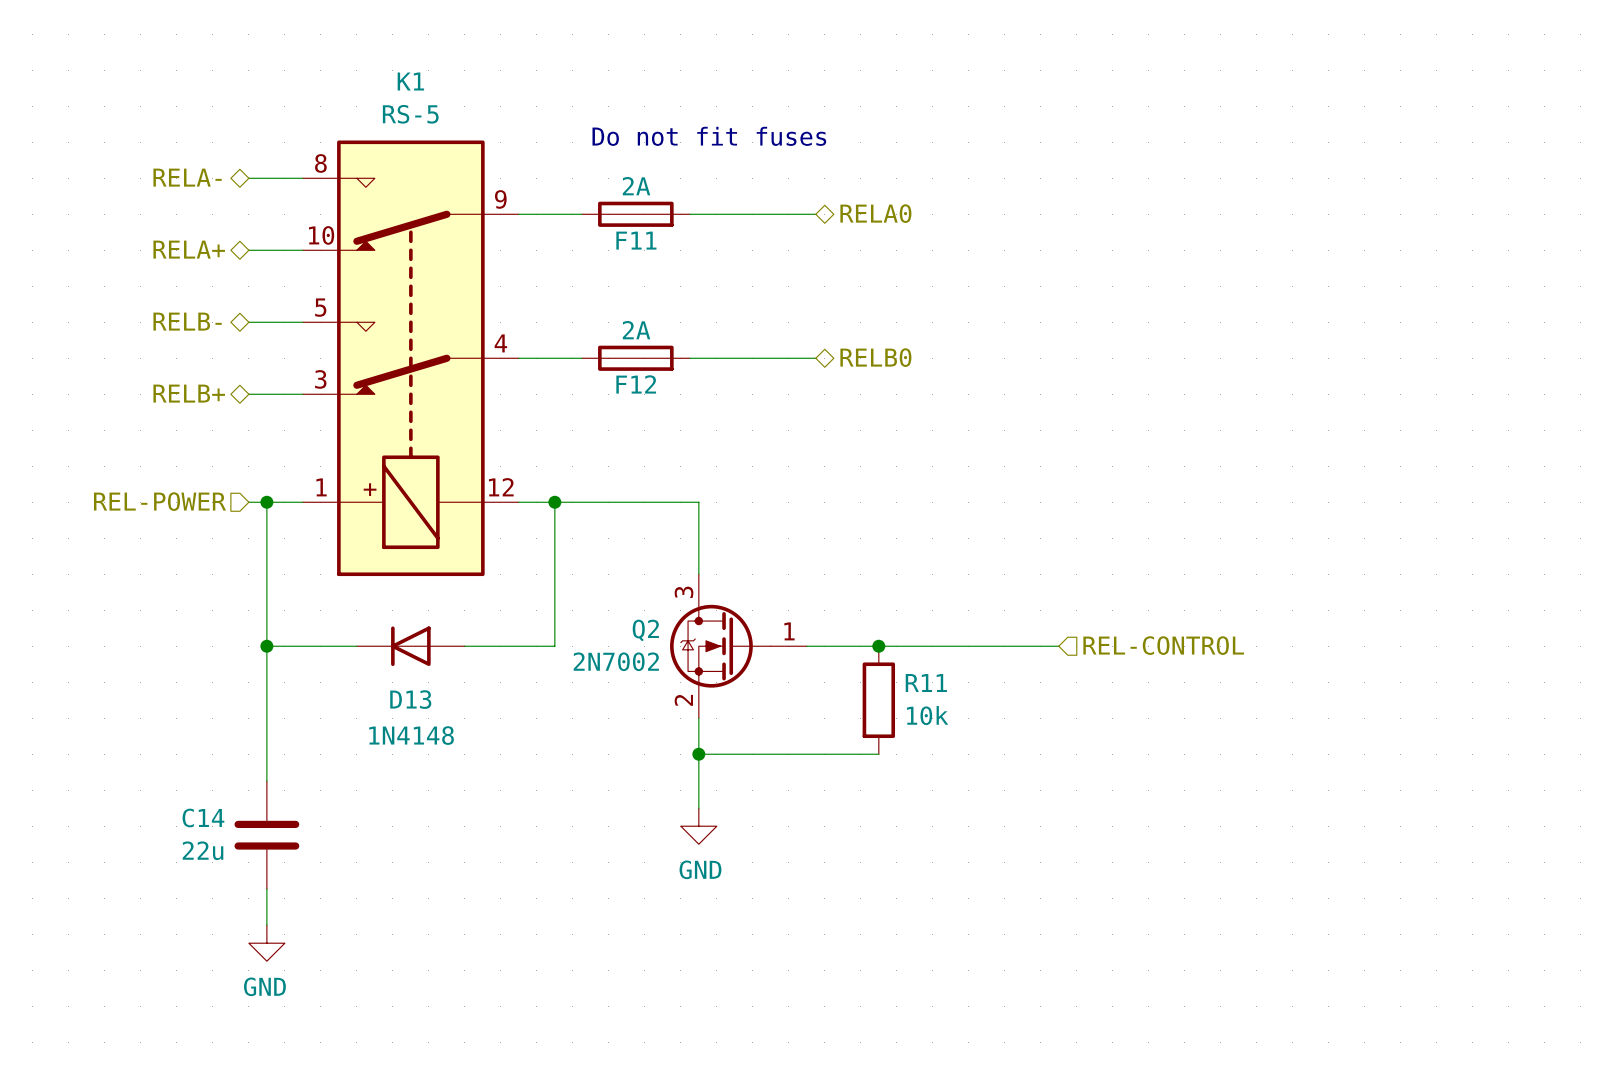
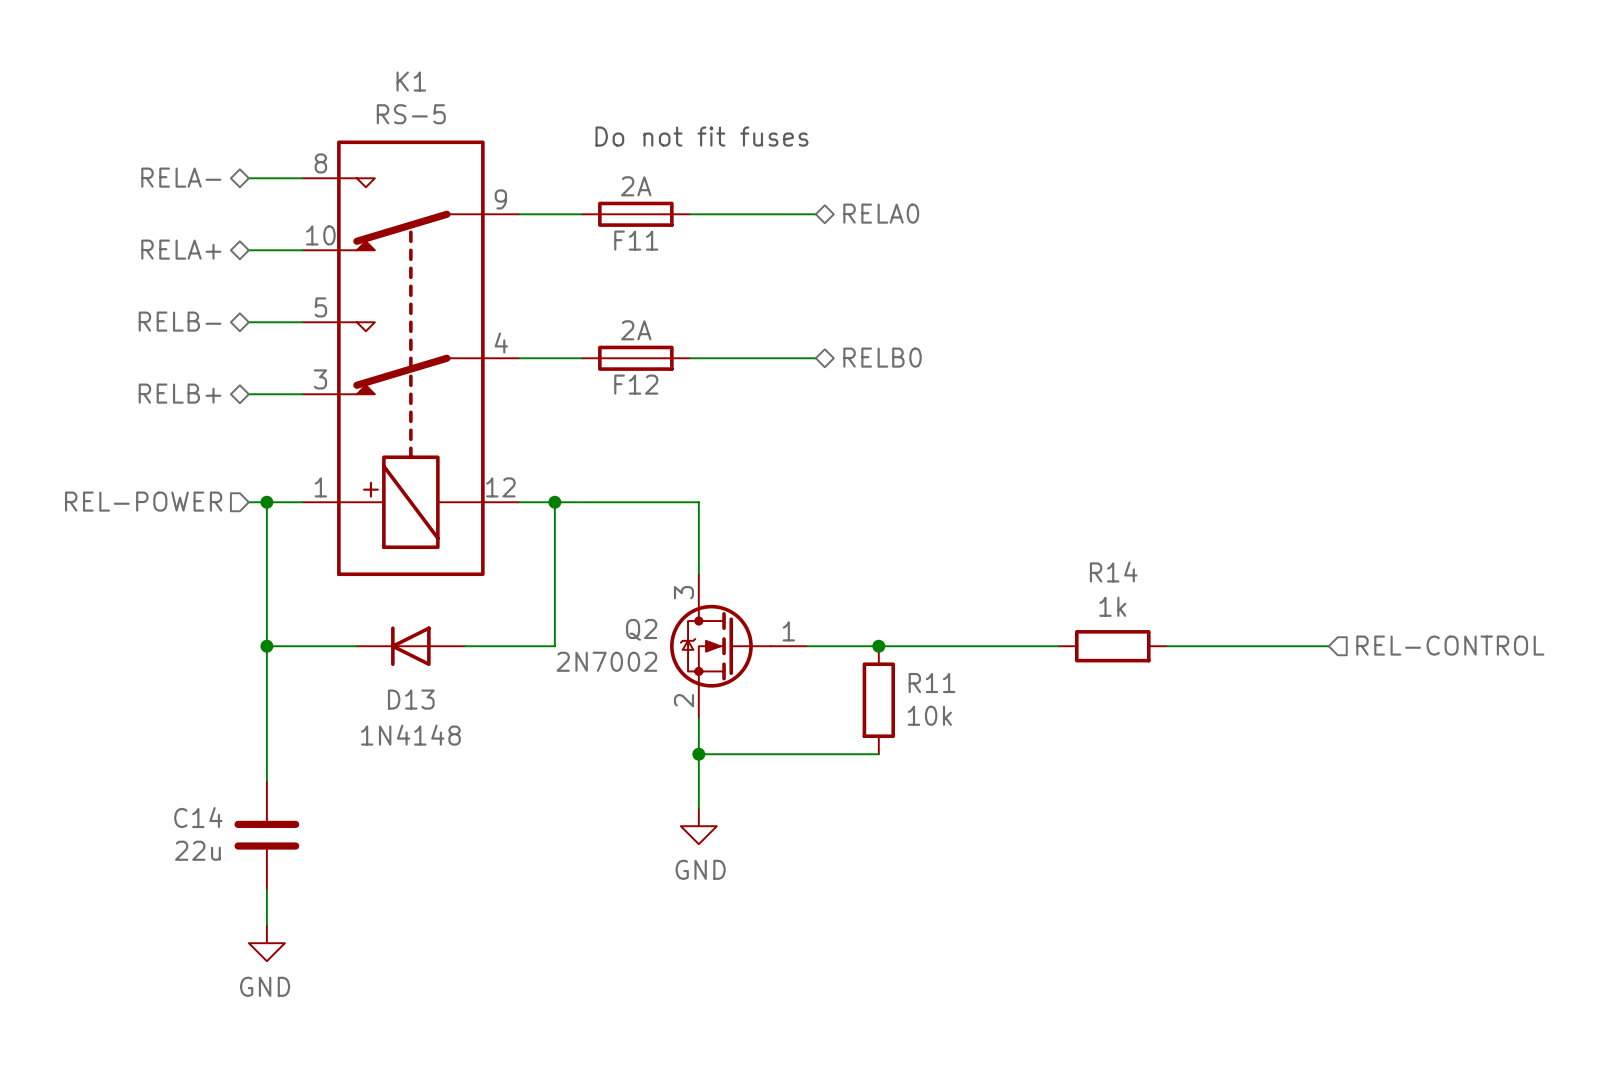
hierarchical label position: REL-CONTROL (1163, 645) -> REL-CONTROL (1450, 645)
R14: none -> 1k (1112, 646)
wire: none -> (1166, 646) (1328, 646)

